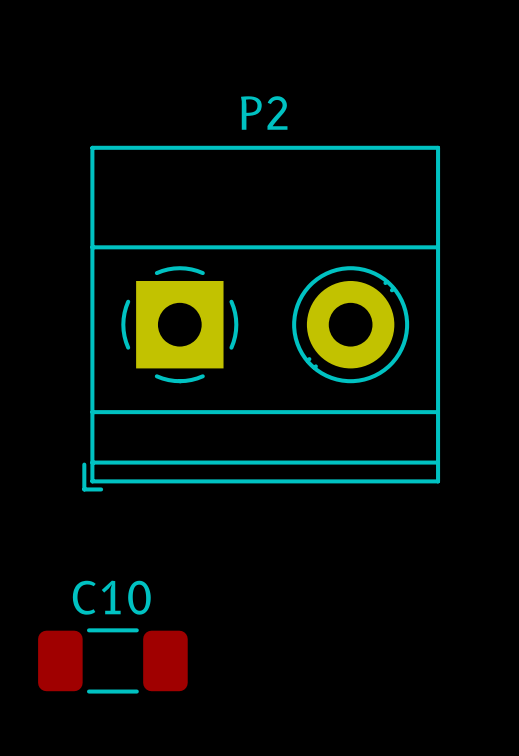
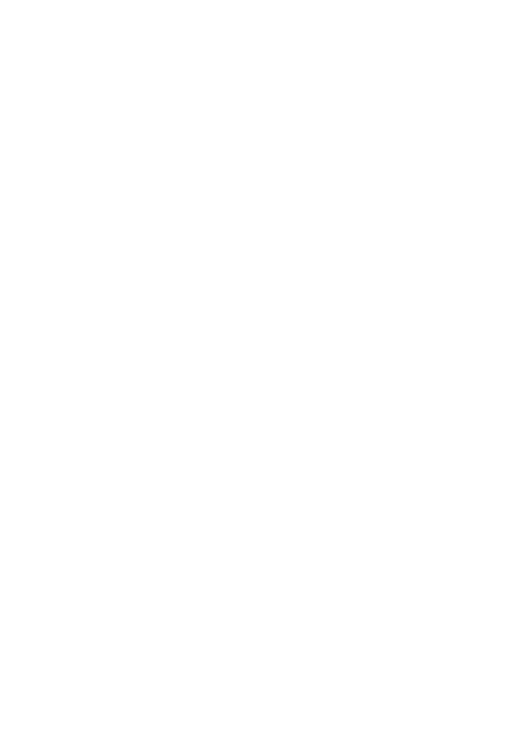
P2: (261, 318) -> none
C10: (112, 660) -> none

